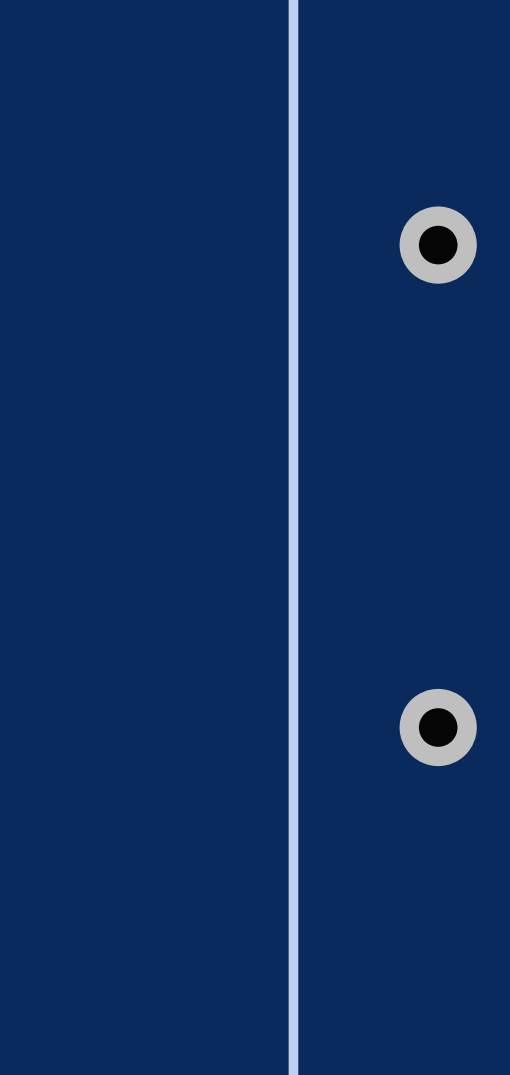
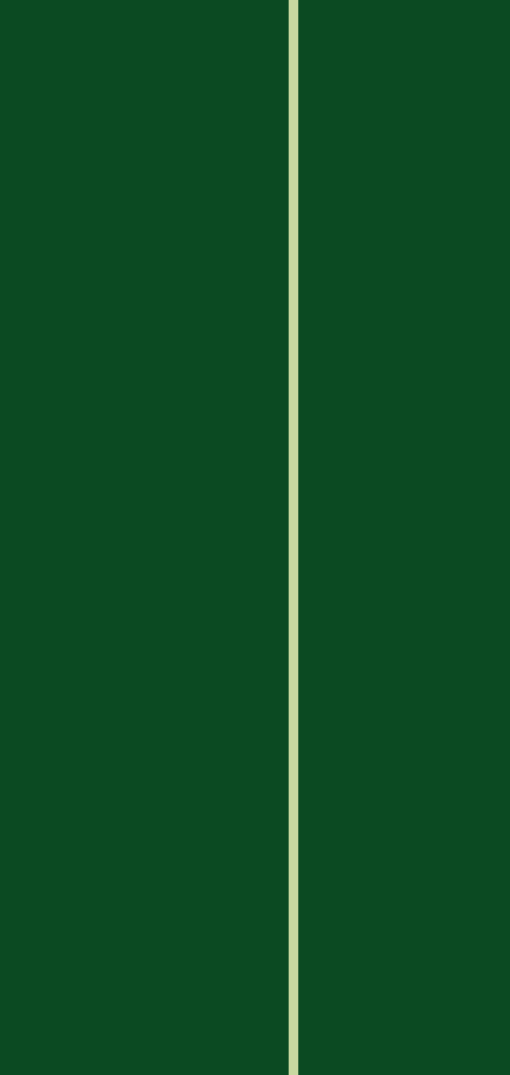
via: (438, 245) -> none
via: (438, 727) -> none

